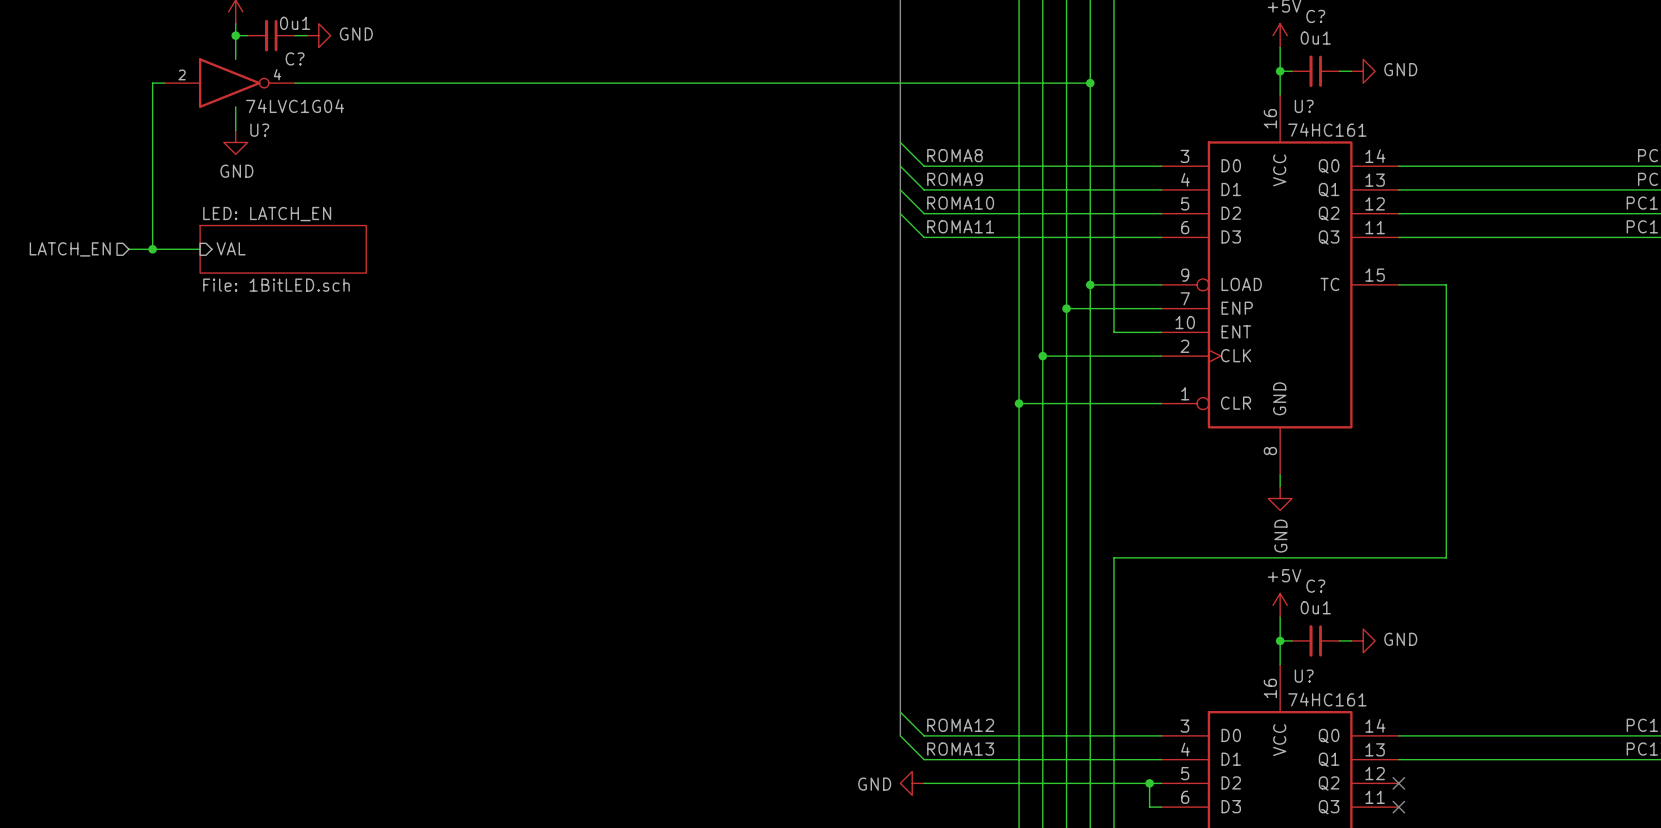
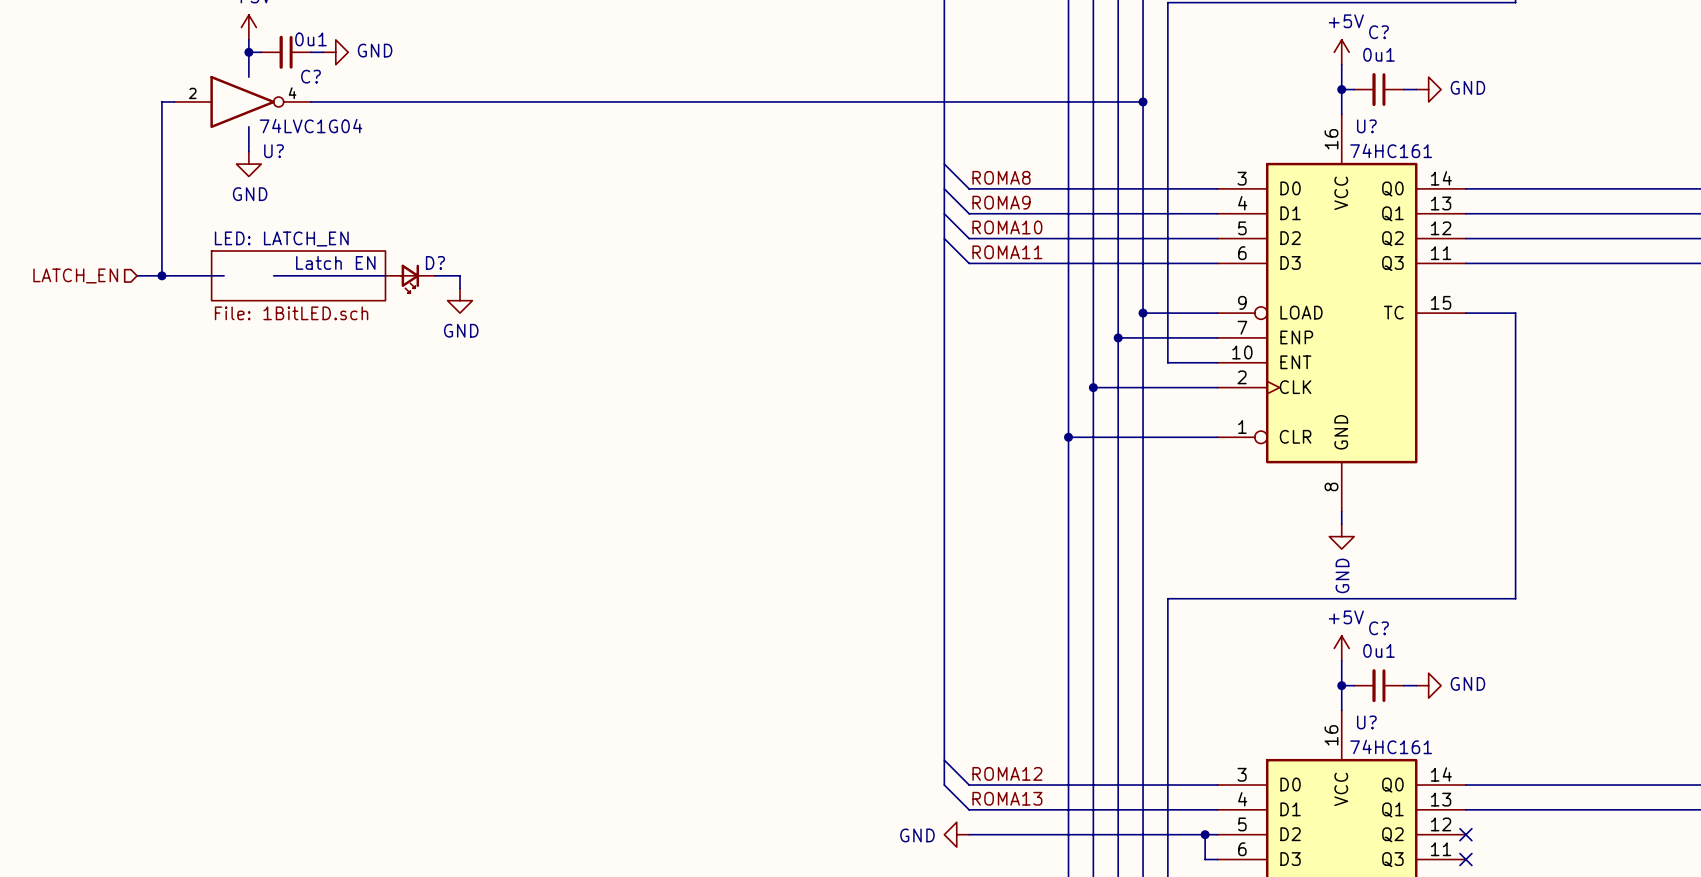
sheet pin: VAL (231, 248) -> none
wire: none -> (211, 275) (224, 275)
wire: none -> (273, 275) (385, 275)
wire: none -> (435, 275) (460, 275) (460, 288)
D?: none -> Latch EN (410, 278)
power symbol: none -> GND (460, 300)

